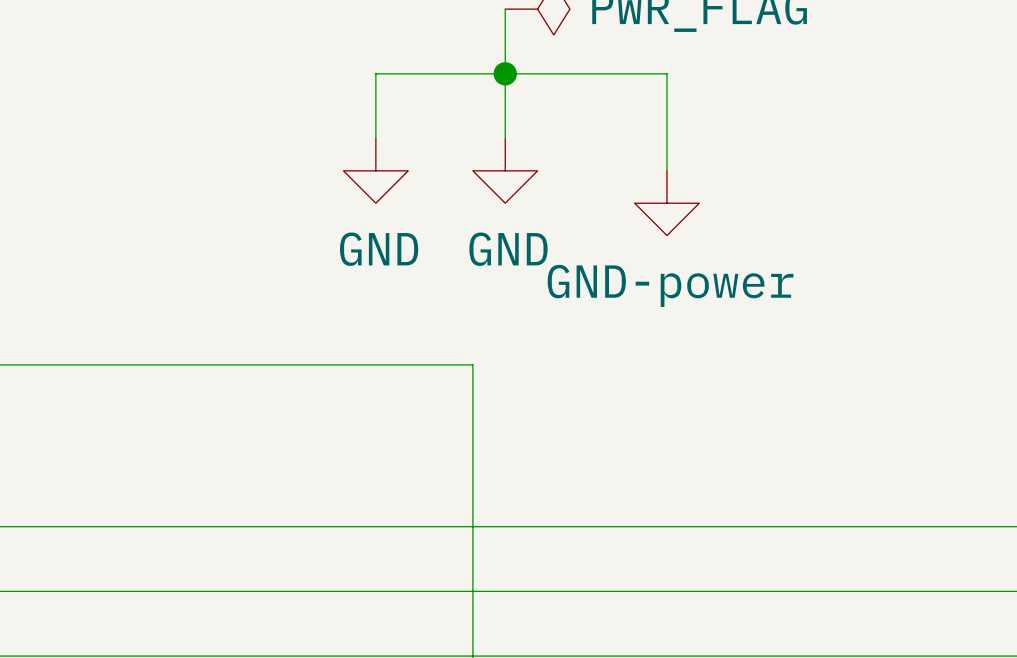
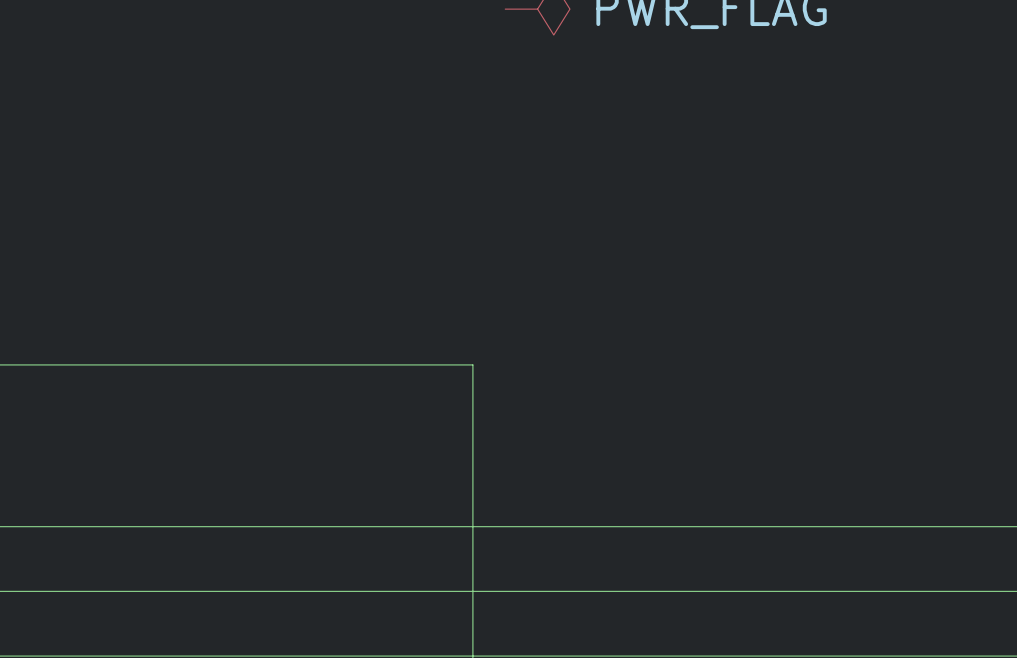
wire: (505, 9) (505, 138) -> none
junction: (505, 73) -> none
wire: (375, 138) (375, 73) (666, 73) (666, 170) -> none
power symbol: GND (375, 170) -> none
power symbol: GND (505, 170) -> none
power symbol: GND-power (666, 203) -> none

